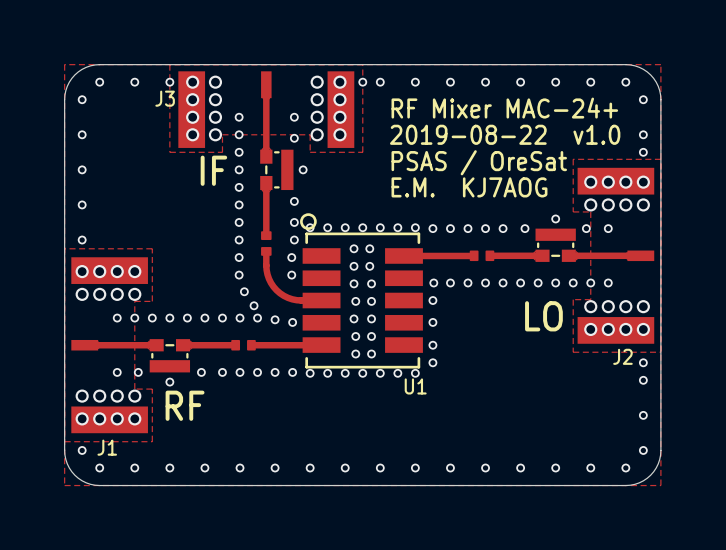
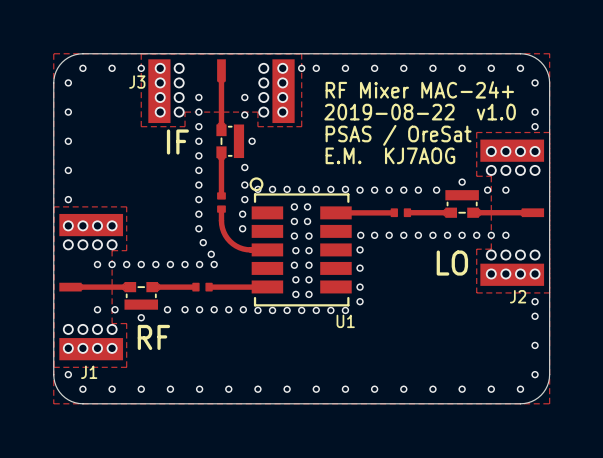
via: (275, 319) -> none
via: (292, 322) -> none

